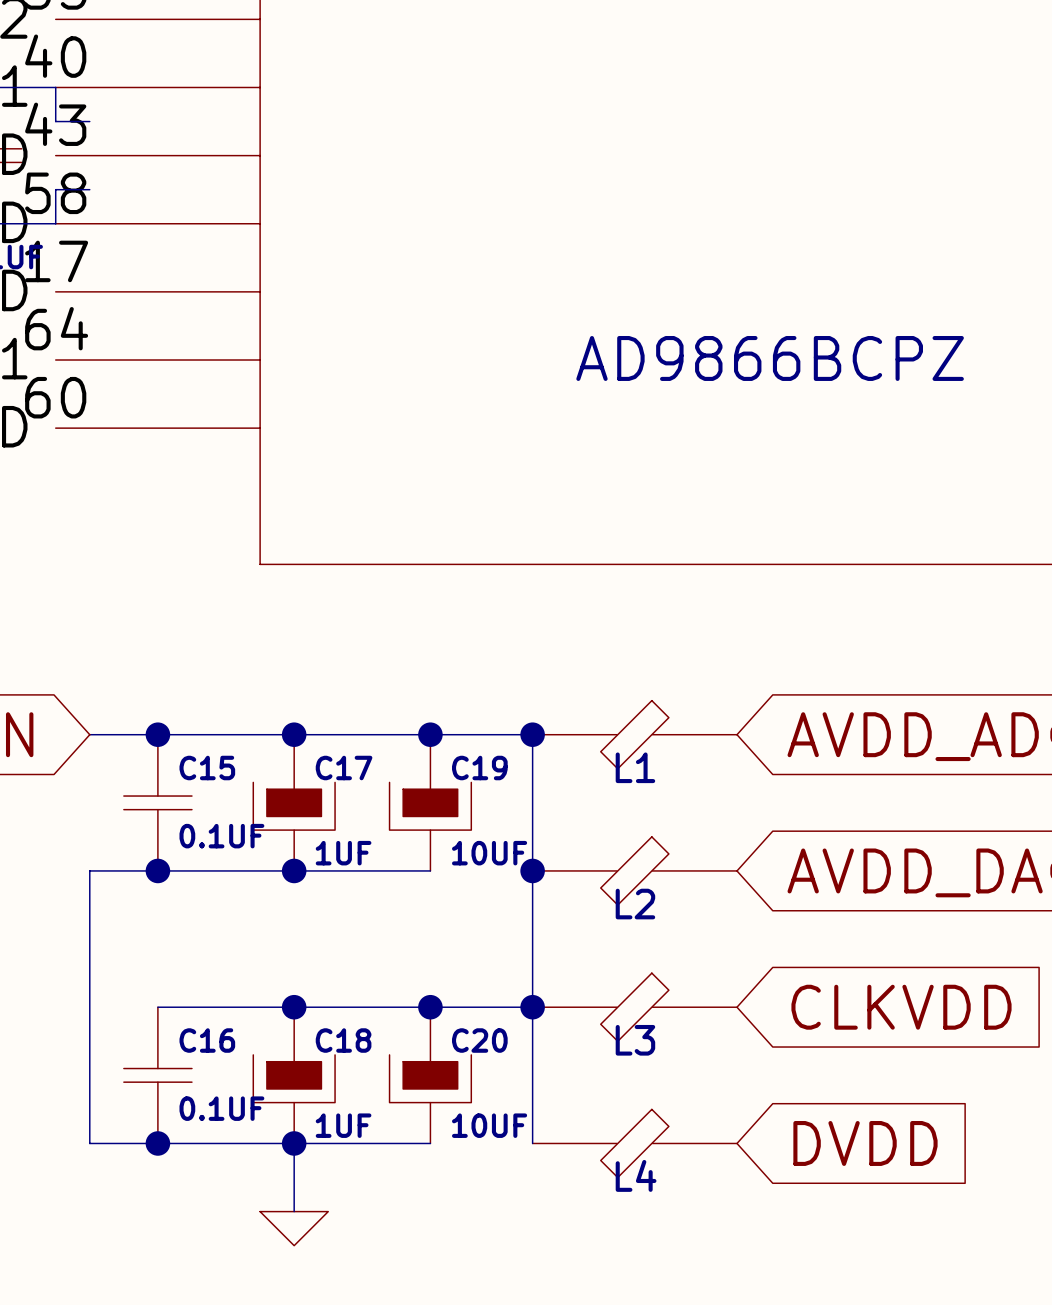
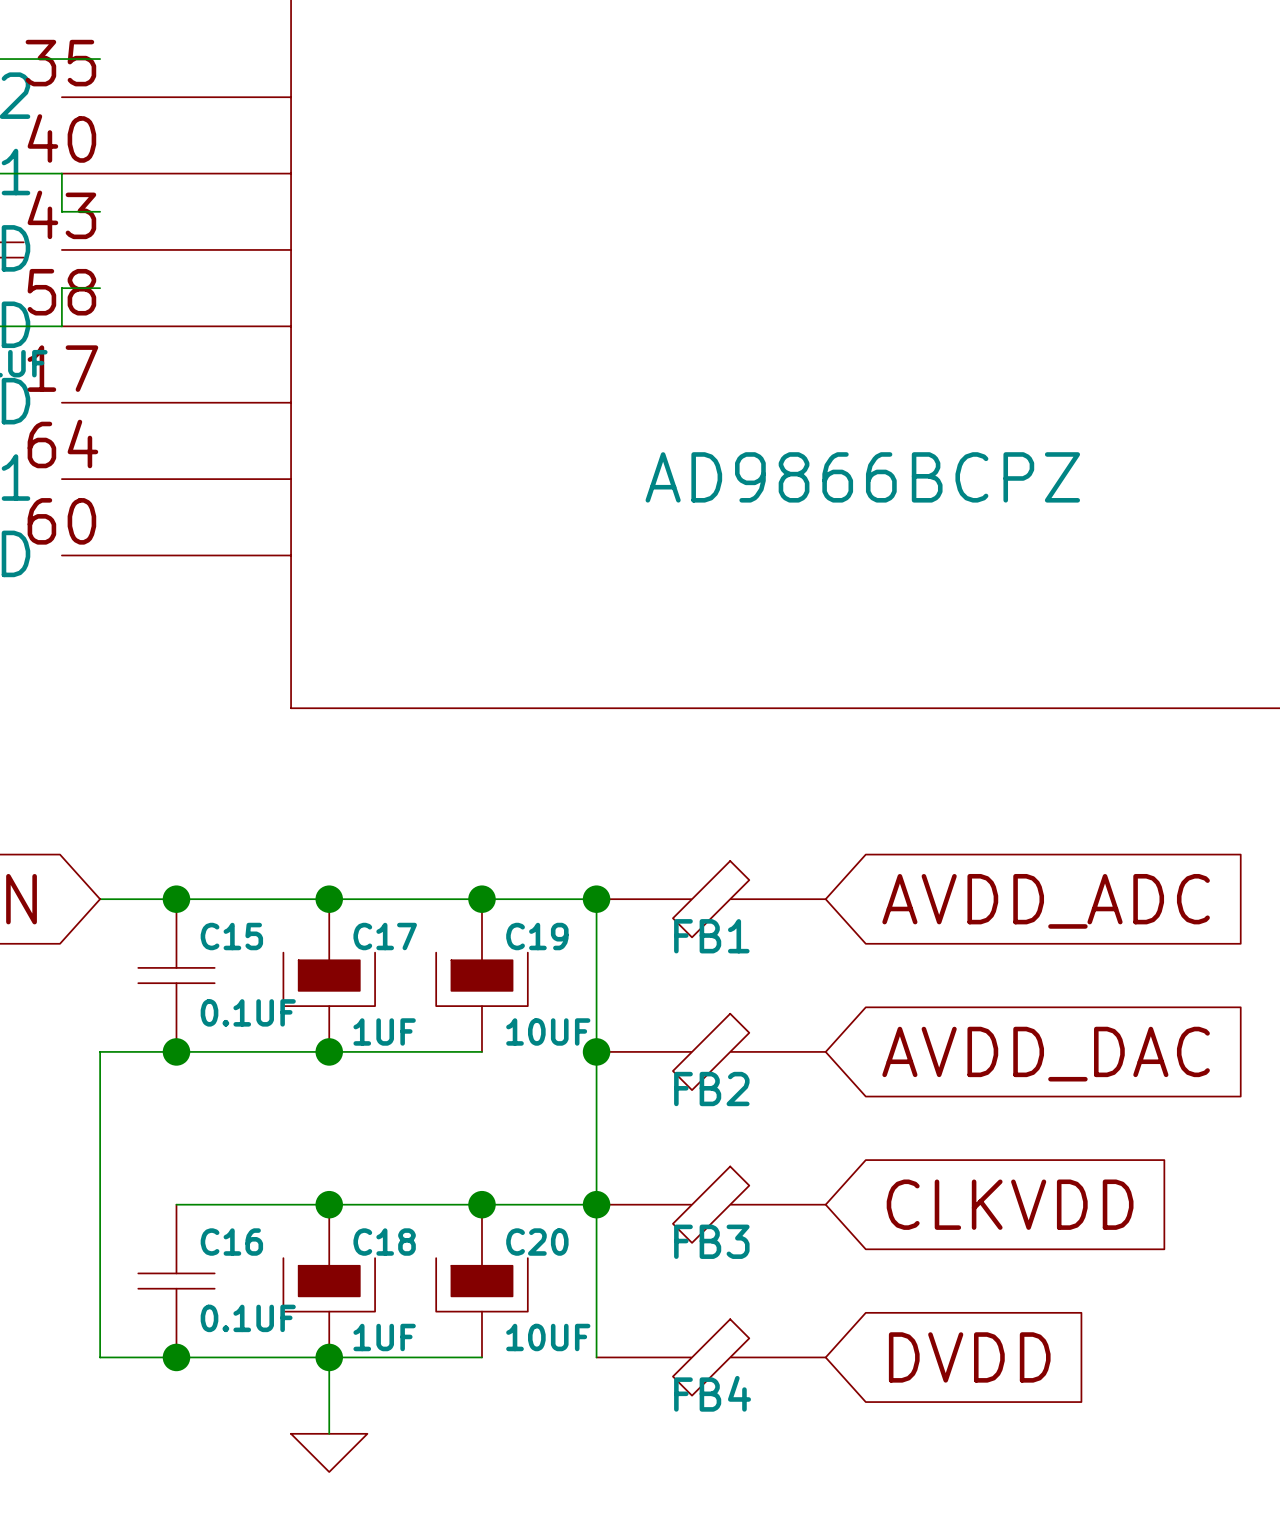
L1 name: L1 (635, 767) -> FB1 (711, 936)
L2 name: L2 (635, 904) -> FB2 (711, 1089)
L3 name: L3 (635, 1040) -> FB3 (711, 1241)
L4 name: L4 (636, 1175) -> FB4 (712, 1393)

